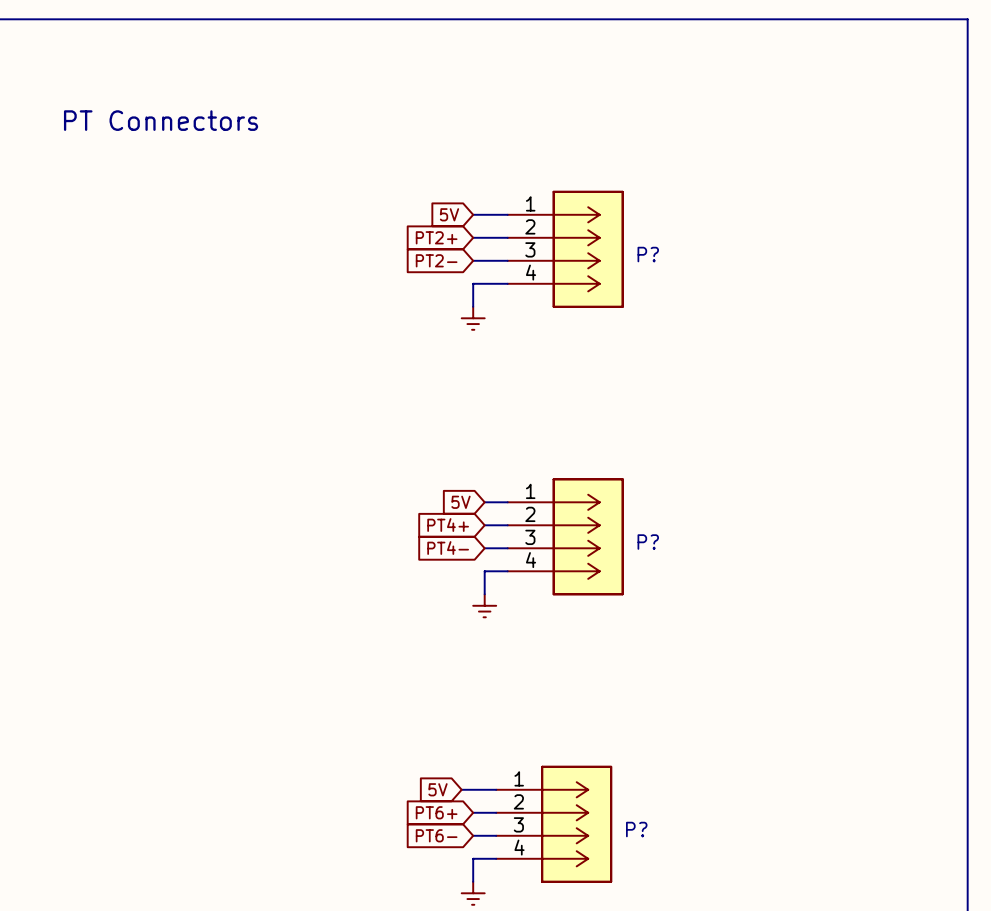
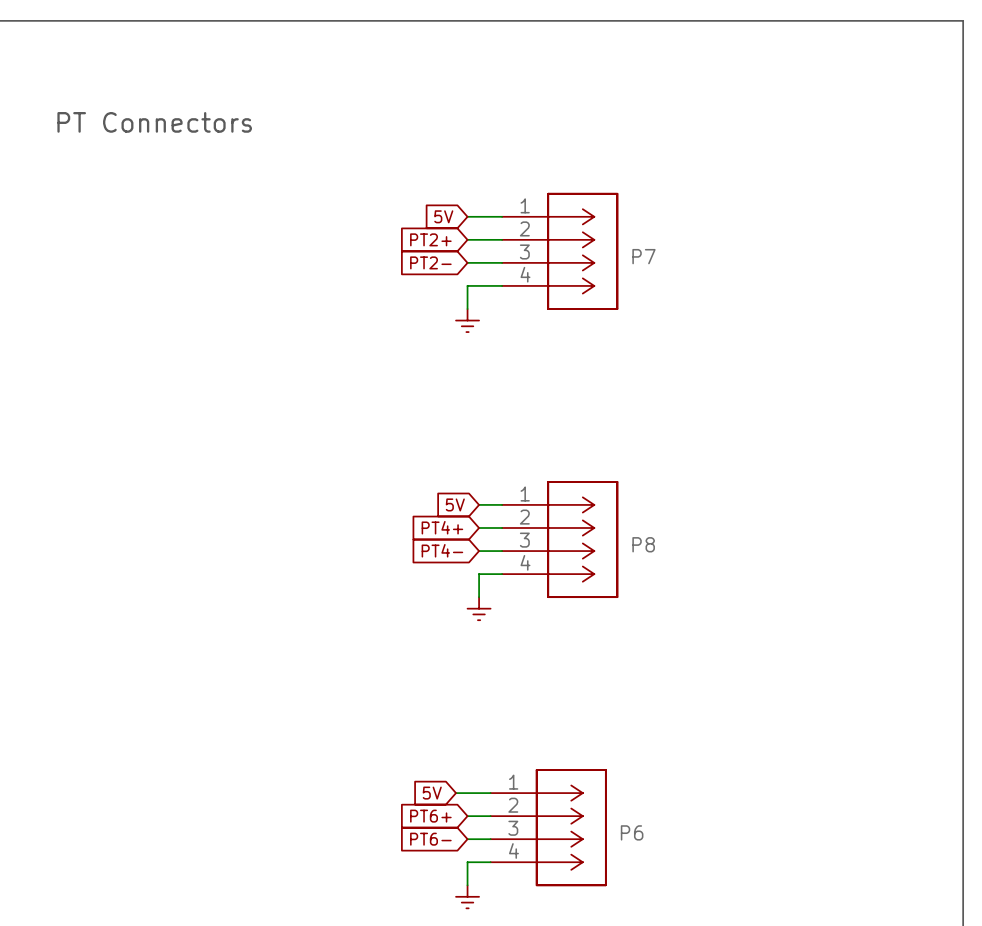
P? name: P? (648, 254) -> P7 (643, 256)
P? name: P? (648, 542) -> P8 (643, 544)
P? name: P? (636, 829) -> P6 (632, 832)

